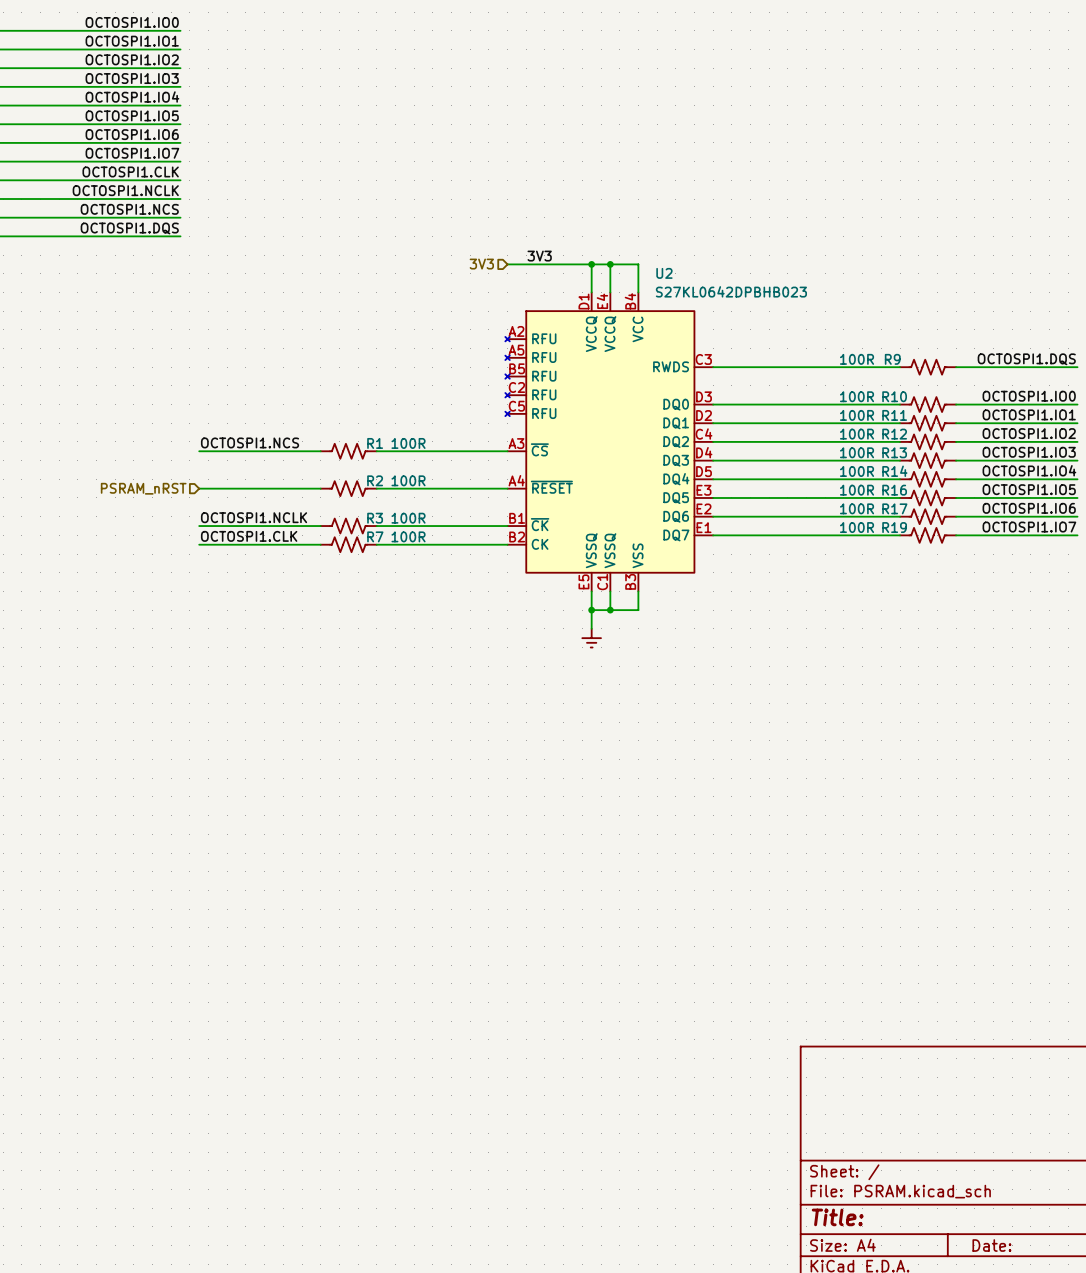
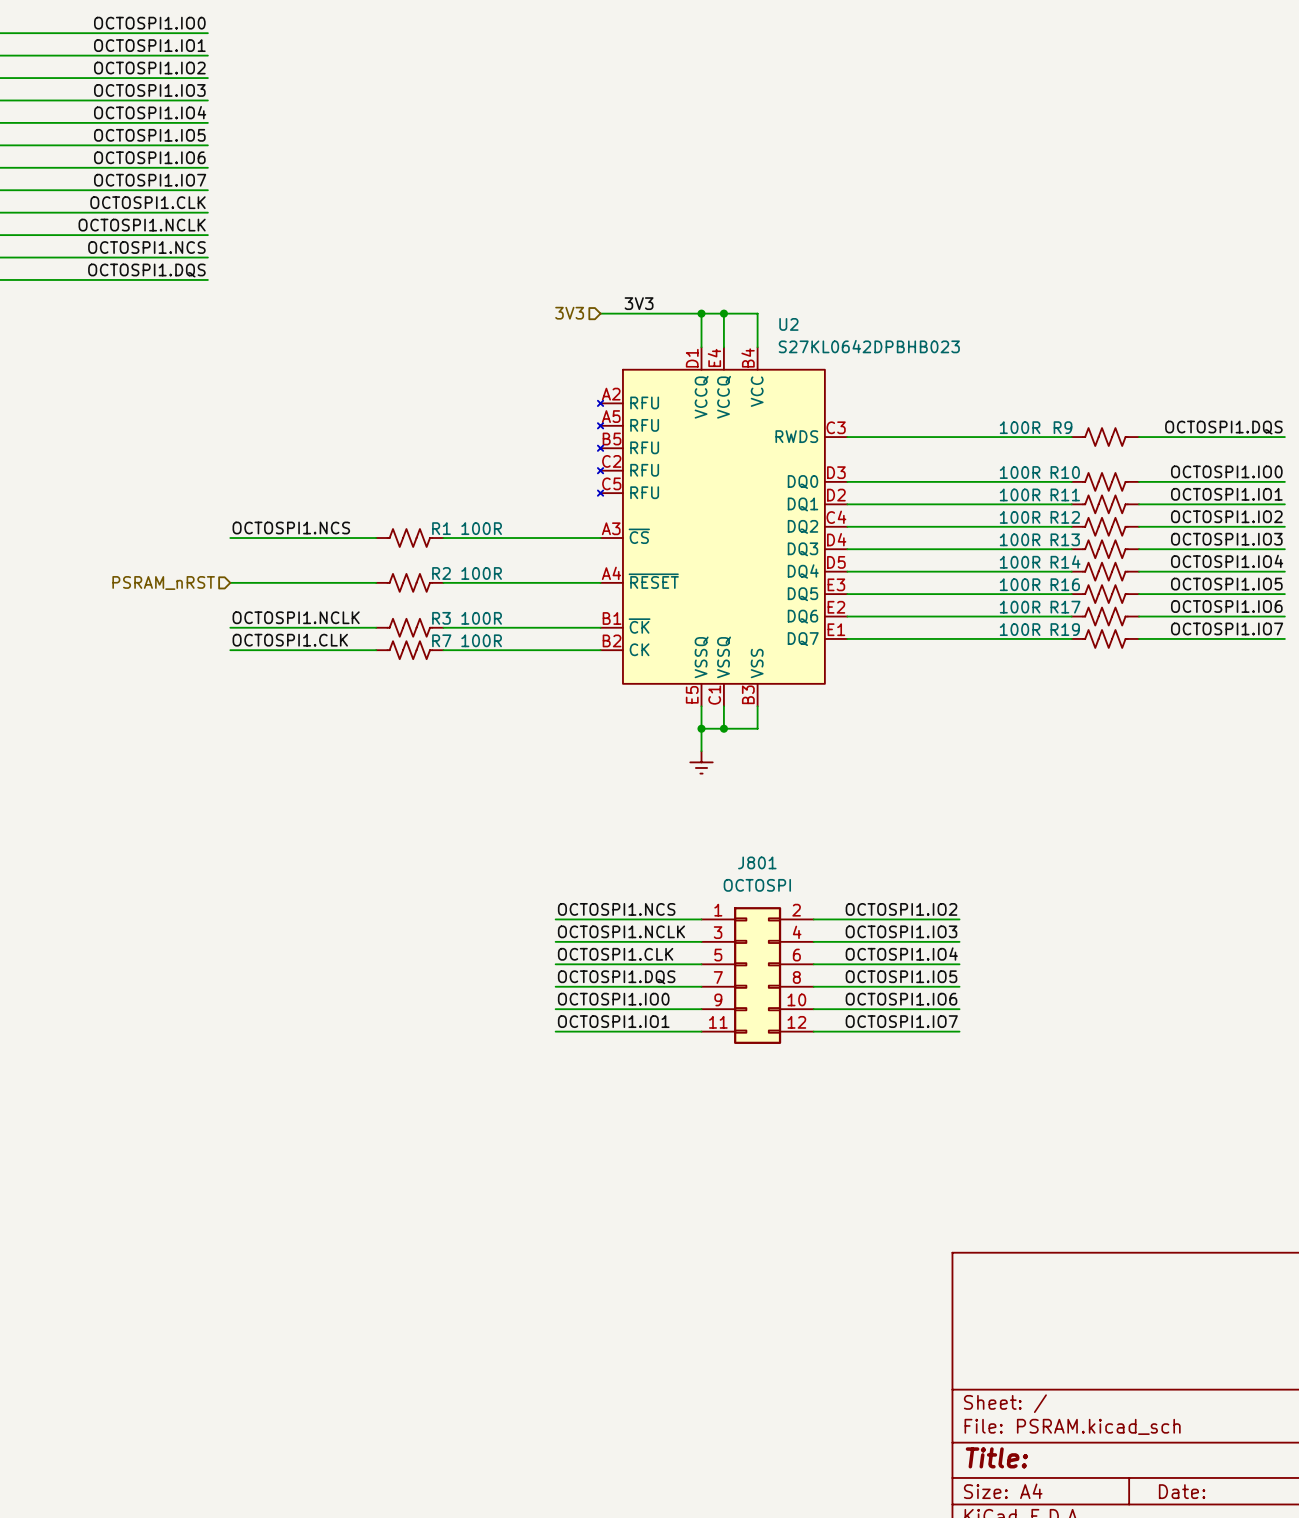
label: none -> OCTOSPI1.NCS (616, 909)
label: none -> OCTOSPI1.IO2 (901, 909)
wire: none -> (555, 919) (701, 919)
wire: none -> (813, 919) (959, 919)
label: none -> OCTOSPI1.NCLK (621, 931)
label: none -> OCTOSPI1.IO3 (901, 931)
wire: none -> (555, 941) (701, 941)
wire: none -> (813, 941) (959, 941)
label: none -> OCTOSPI1.IO4 (901, 954)
label: none -> OCTOSPI1.CLK (615, 954)
wire: none -> (555, 964) (701, 964)
wire: none -> (813, 964) (959, 964)
J801: none -> OCTOSPI (757, 975)
label: none -> OCTOSPI1.IO5 (901, 976)
label: none -> OCTOSPI1.DQS (616, 977)
wire: none -> (555, 986) (701, 986)
wire: none -> (813, 986) (959, 986)
label: none -> OCTOSPI1.IO0 (613, 999)
label: none -> OCTOSPI1.IO6 (901, 999)
wire: none -> (555, 1009) (701, 1009)
wire: none -> (813, 1009) (959, 1009)
label: none -> OCTOSPI1.IO1 (613, 1021)
label: none -> OCTOSPI1.IO7 (901, 1021)
wire: none -> (555, 1031) (701, 1031)
wire: none -> (813, 1031) (959, 1031)

